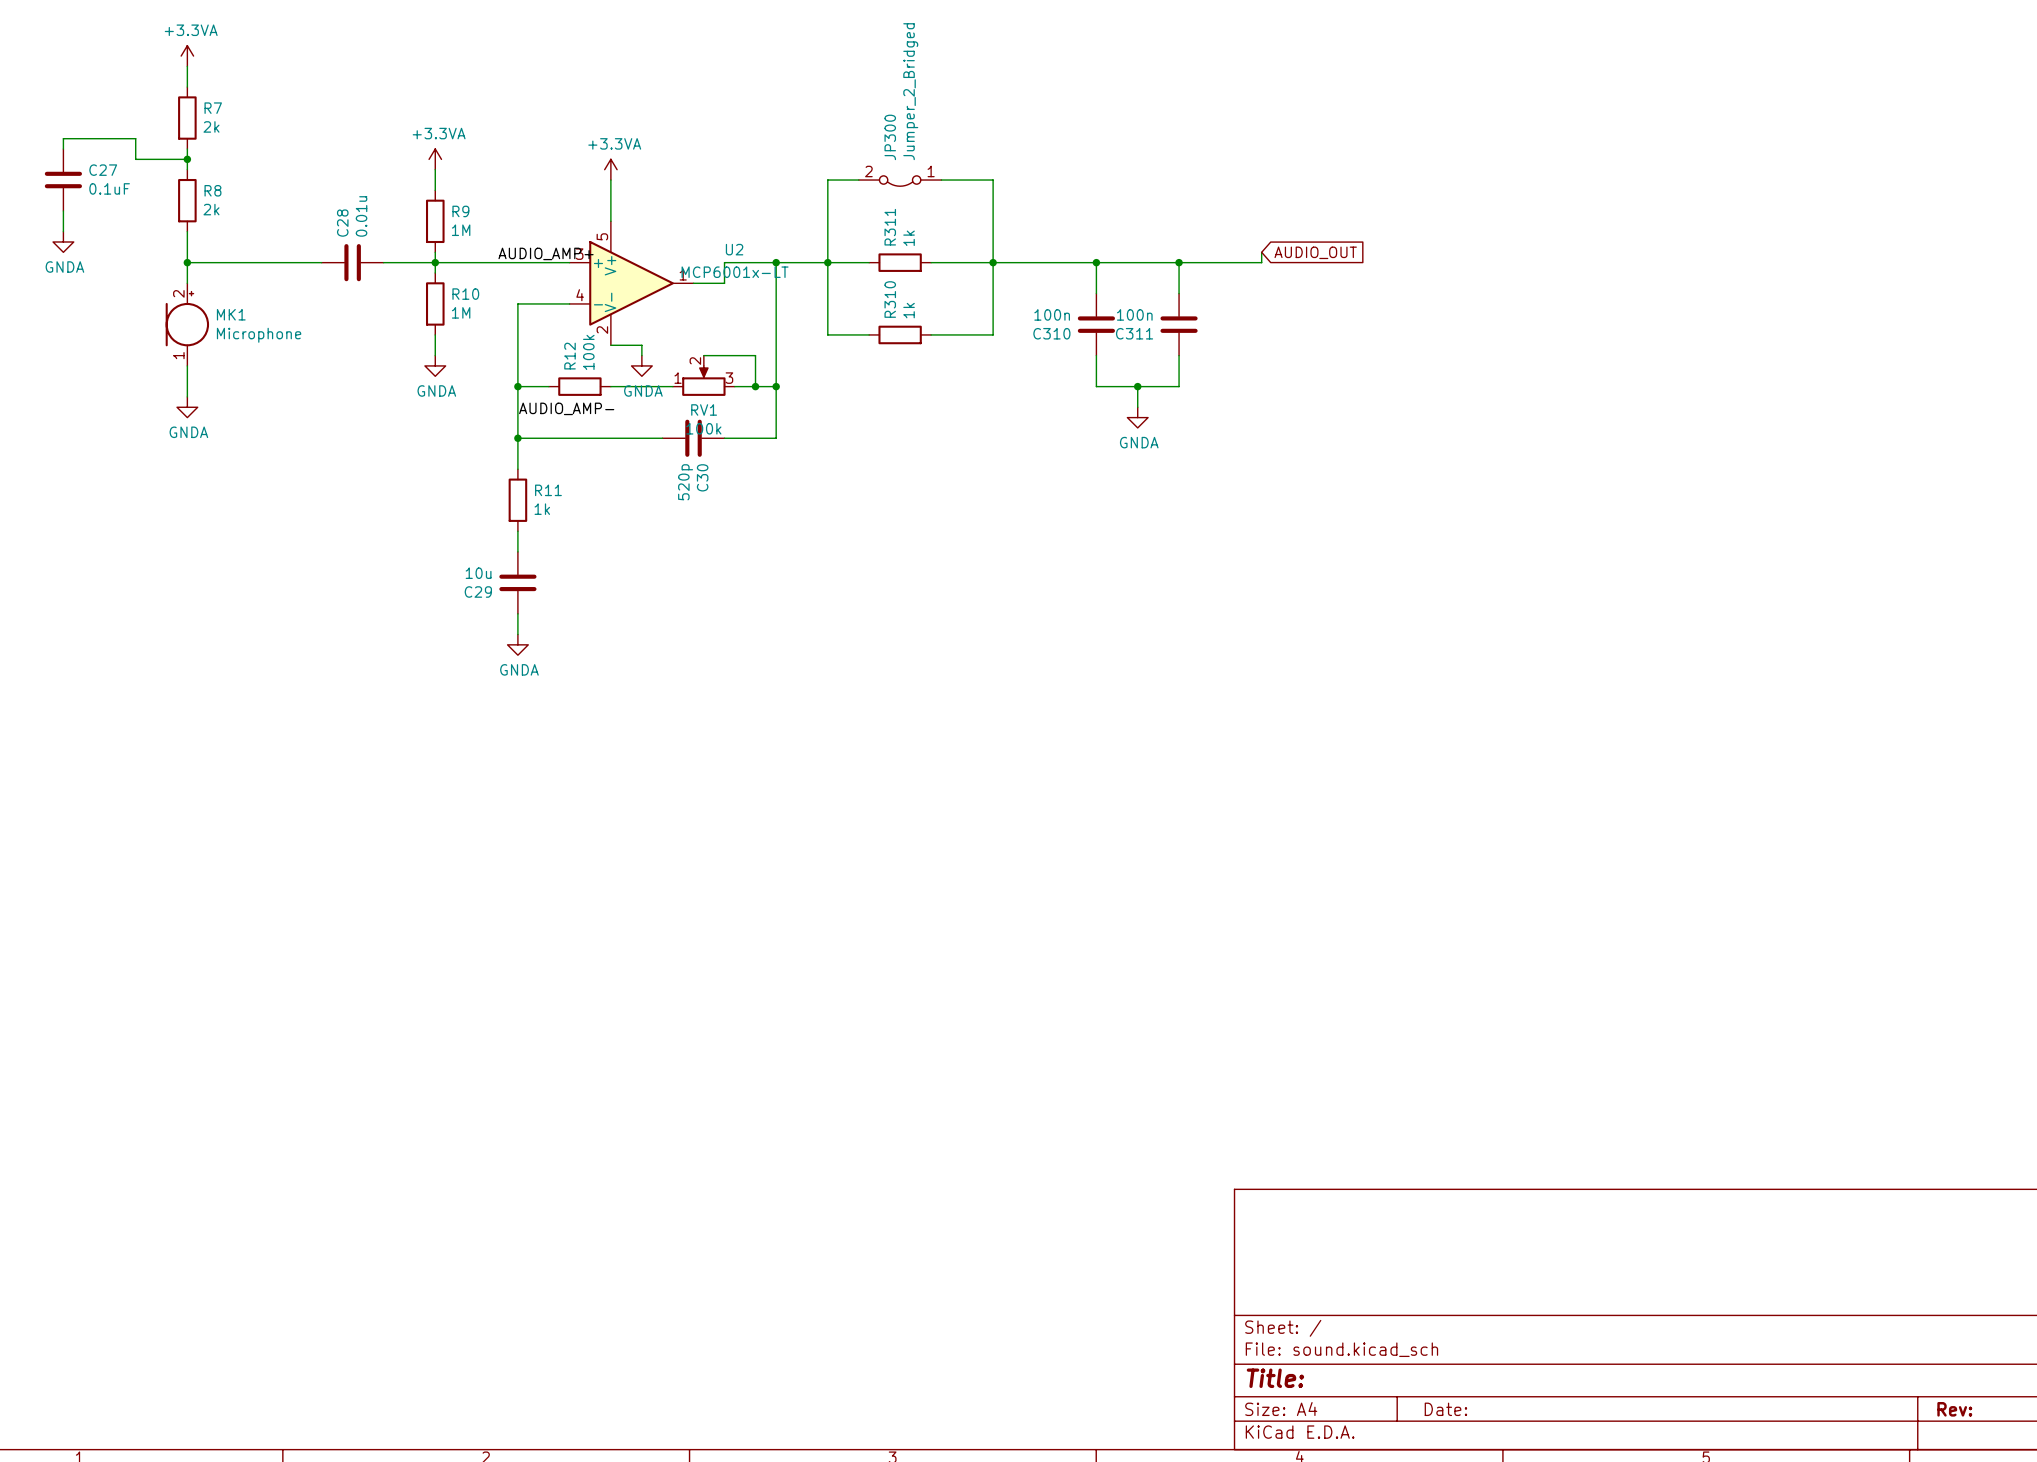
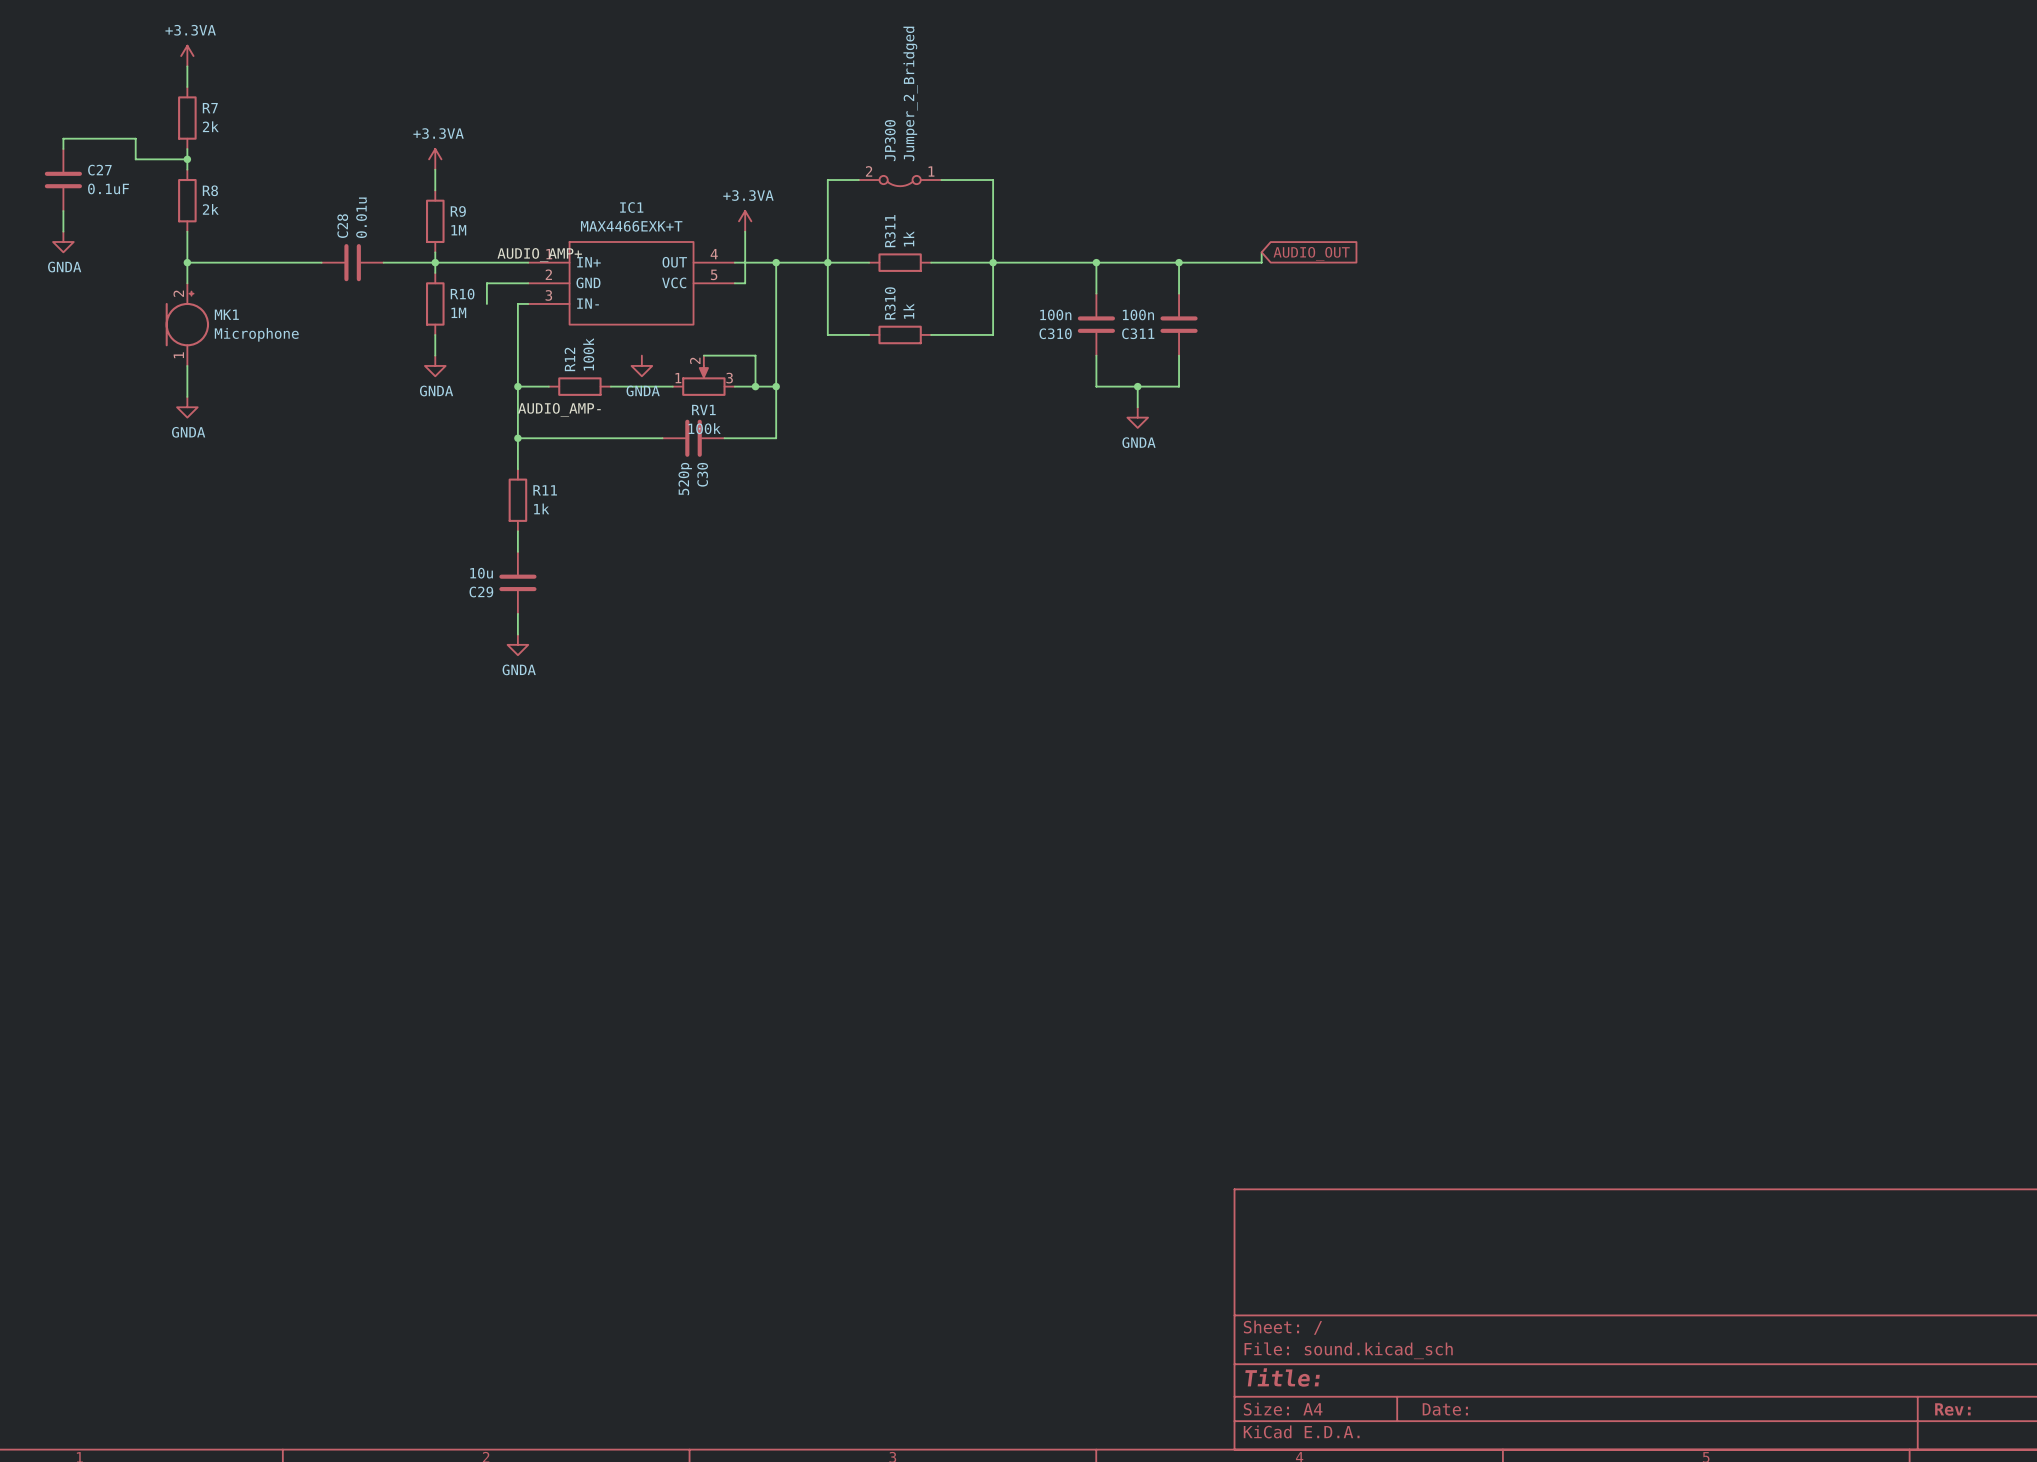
power symbol position: +3.3VA (610, 169) -> +3.3VA (745, 221)
wire: (610, 180) (610, 221) -> none
wire: none -> (745, 231) (745, 283) (734, 283)
wire: none -> (528, 283) (486, 283) (486, 303)
U2: MCP6001x-LT (631, 283) -> none
IC1: none -> MAX4466EXK+T (631, 283)
wire: (610, 345) (641, 345) (641, 355) -> none

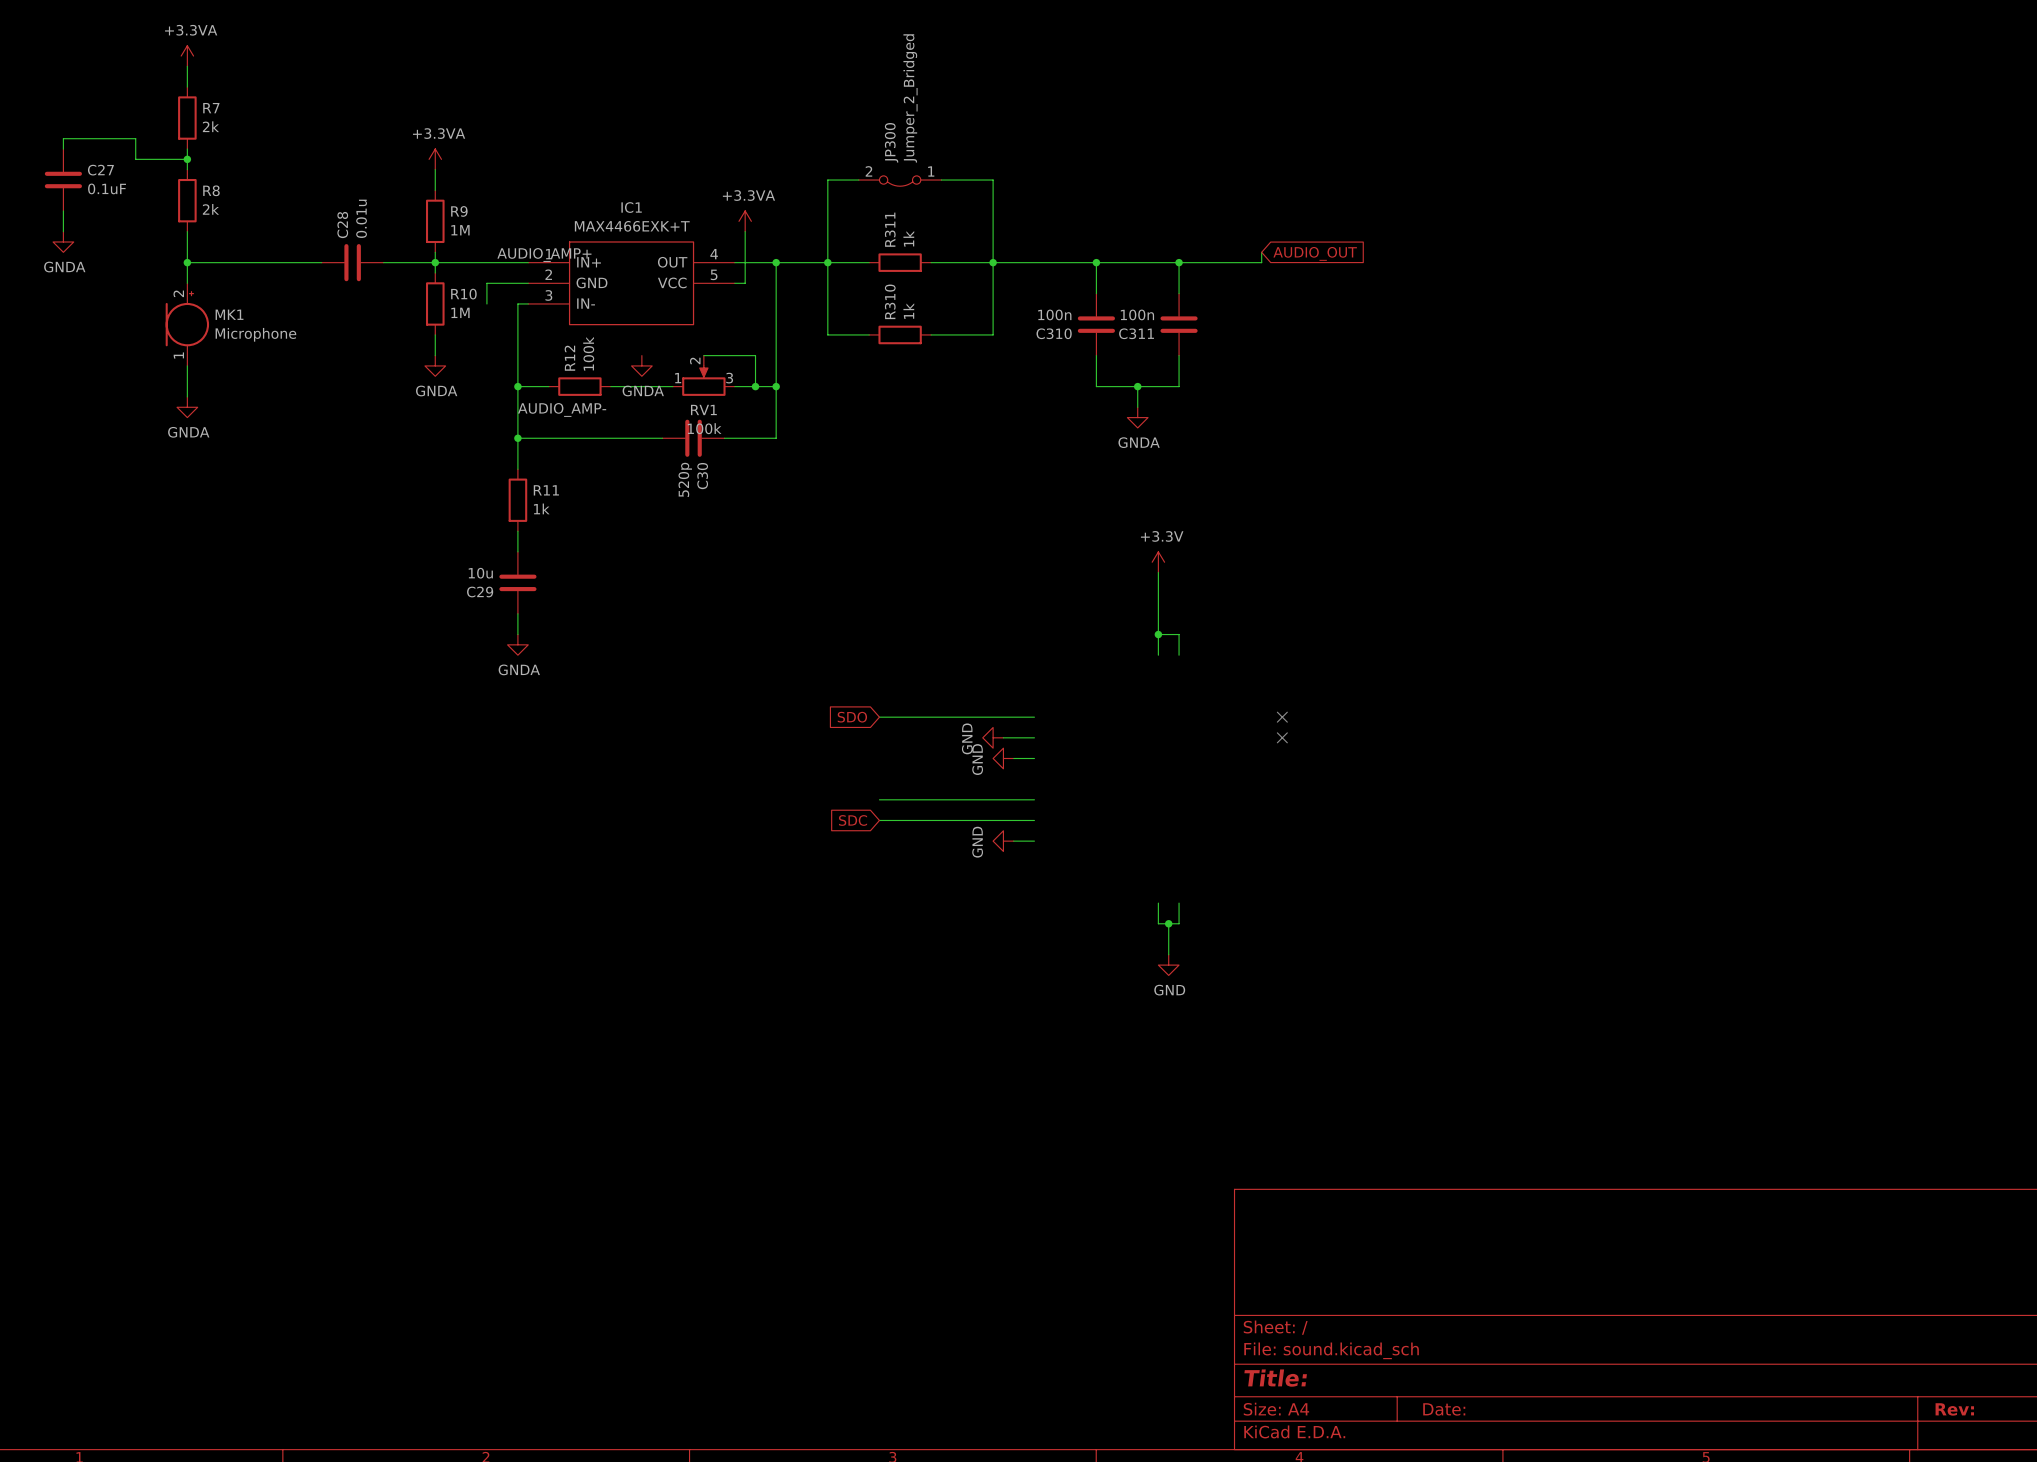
power symbol: none -> +3.3V (1158, 562)
wire: none -> (1158, 572) (1158, 655)
wire: none -> (1158, 634) (1179, 634) (1179, 655)
junction: none -> (1158, 634)
global label: none -> SDO (852, 717)
wire: none -> (879, 717) (1034, 717)
no-connect mark: none -> (1282, 717)
power symbol: none -> GND (993, 737)
wire: none -> (1003, 737) (1034, 737)
no-connect mark: none -> (1282, 737)
power symbol: none -> GND (1003, 758)
wire: none -> (1013, 758) (1034, 758)
wire: none -> (879, 799) (1034, 799)
global label: none -> SDC (853, 820)
wire: none -> (879, 820) (1034, 820)
power symbol: none -> GND (1003, 841)
wire: none -> (1013, 841) (1034, 841)
wire: none -> (1158, 903) (1158, 923) (1179, 923) (1179, 903)
wire: none -> (1168, 923) (1168, 954)
junction: none -> (1168, 923)
power symbol: none -> GND (1168, 965)

